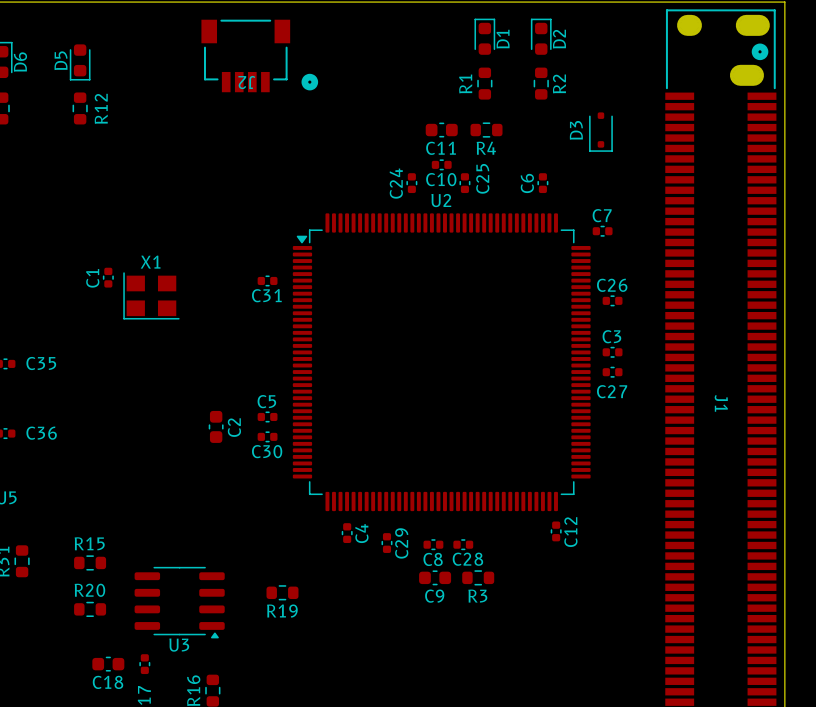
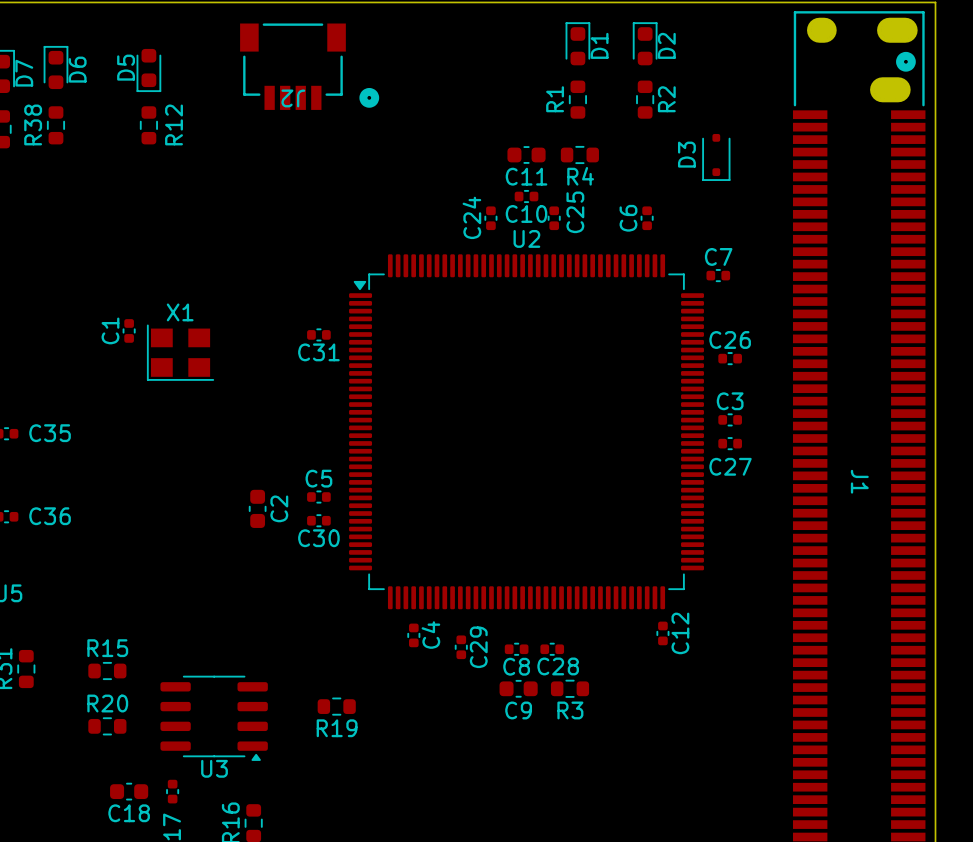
D6: none -> (55, 67)
D6 name: D6 (20, 62) -> D7 (24, 73)
D5 position: (80, 62) -> (148, 70)
R38: none -> (55, 125)
R12 position: (80, 108) -> (148, 125)

